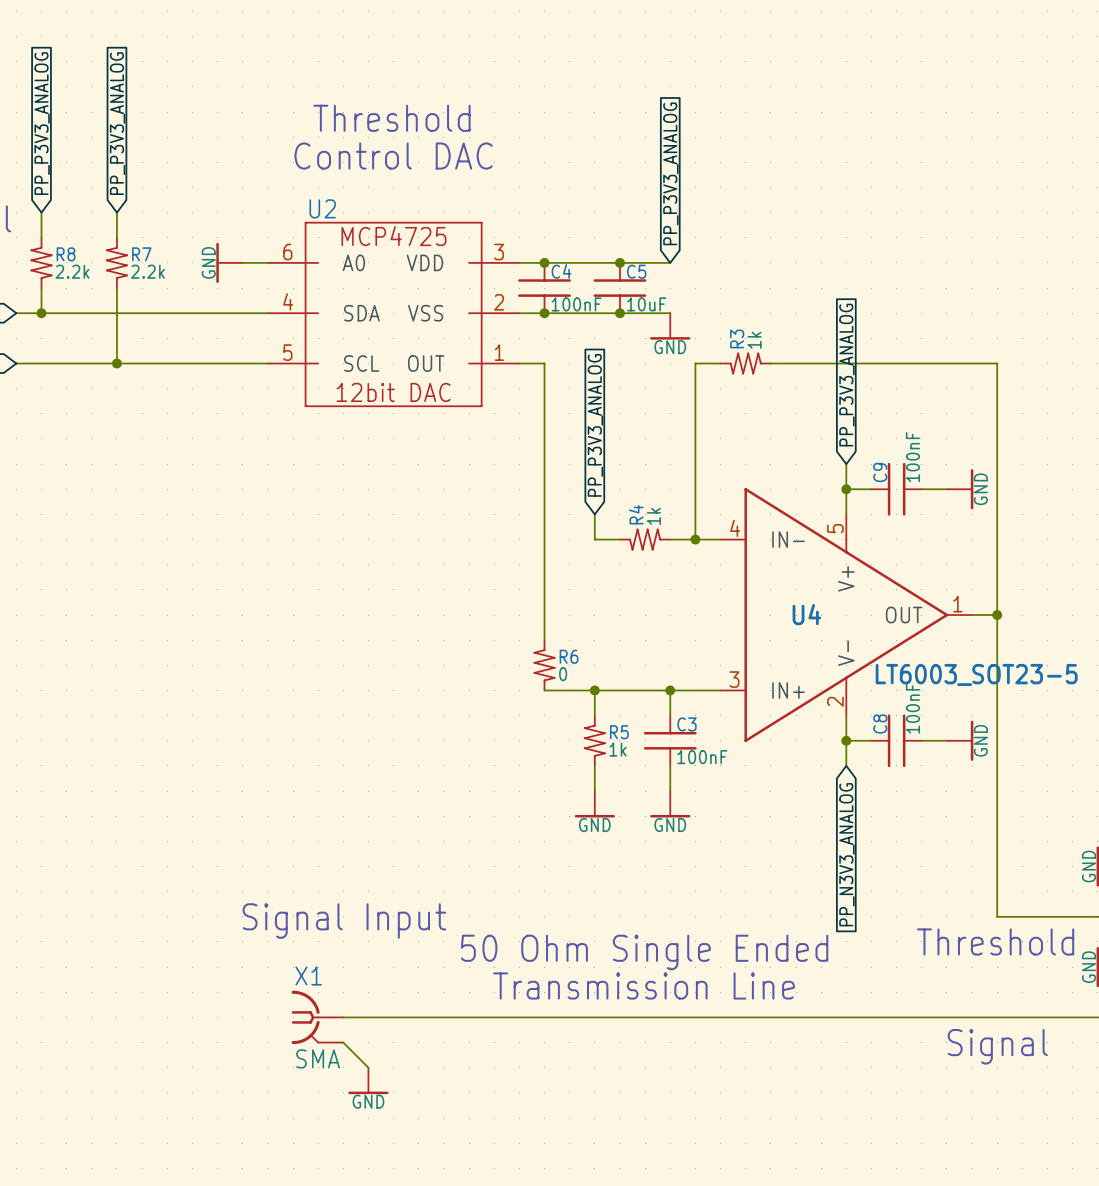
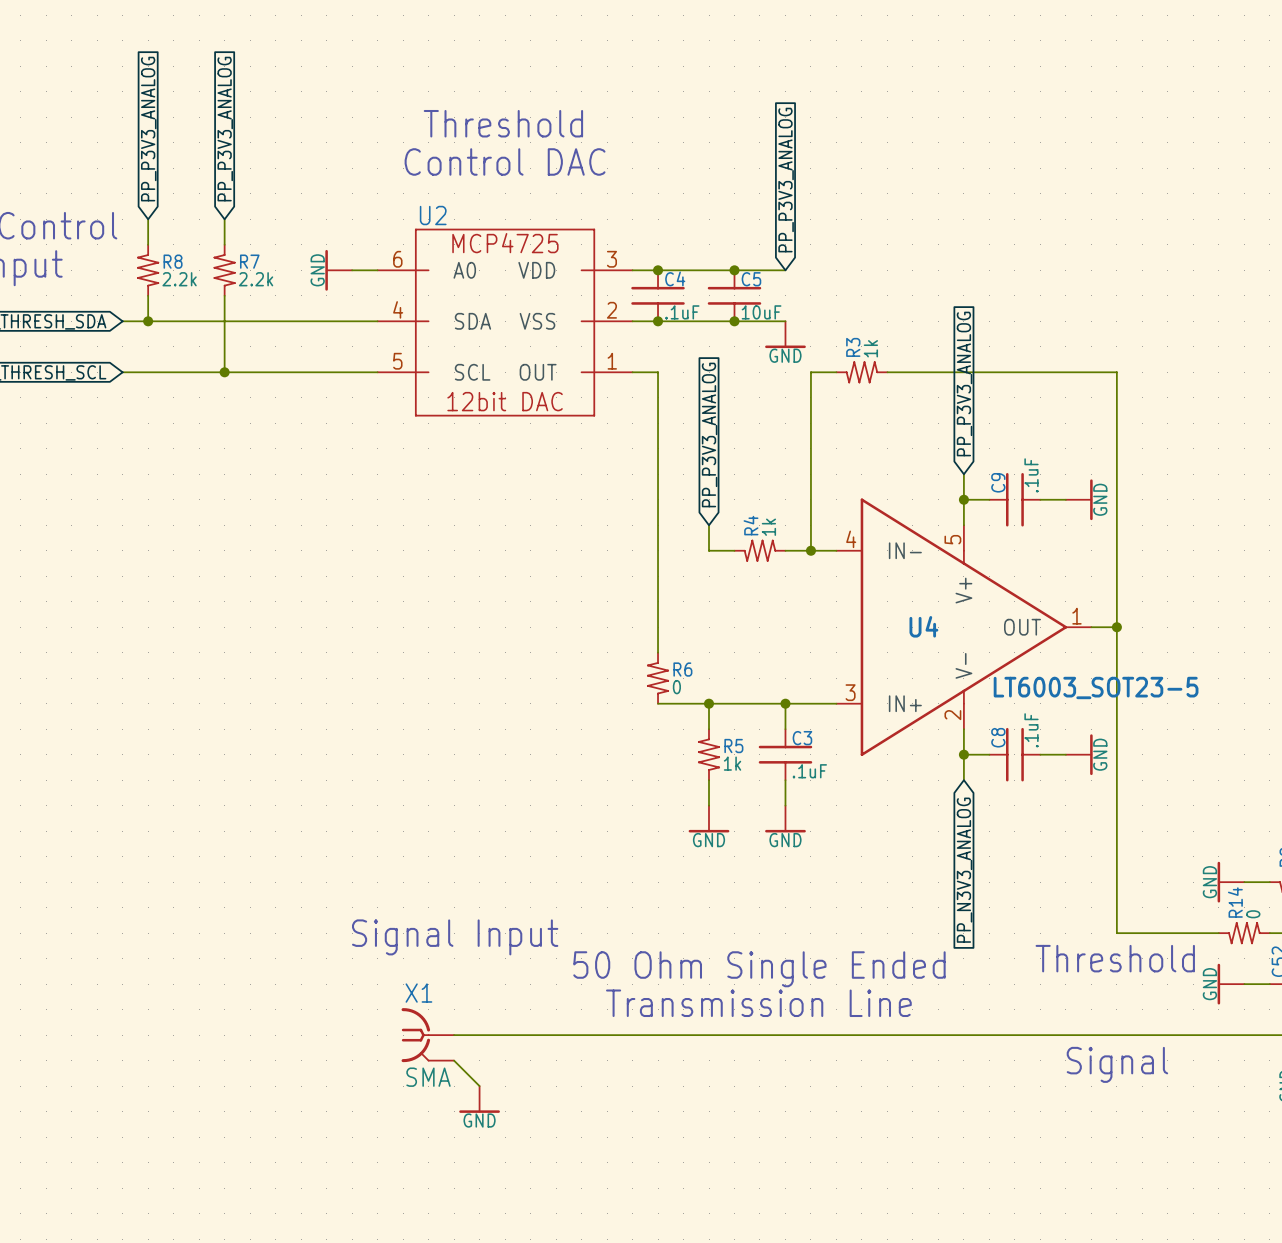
C4 value: 100nF (576, 304) -> .1uF (682, 312)
C9 value: 100nF (912, 457) -> .1uF (1031, 475)
C8 value: 100nF (912, 708) -> .1uF (1031, 730)
C3 value: 100nF (702, 757) -> .1uF (809, 771)

